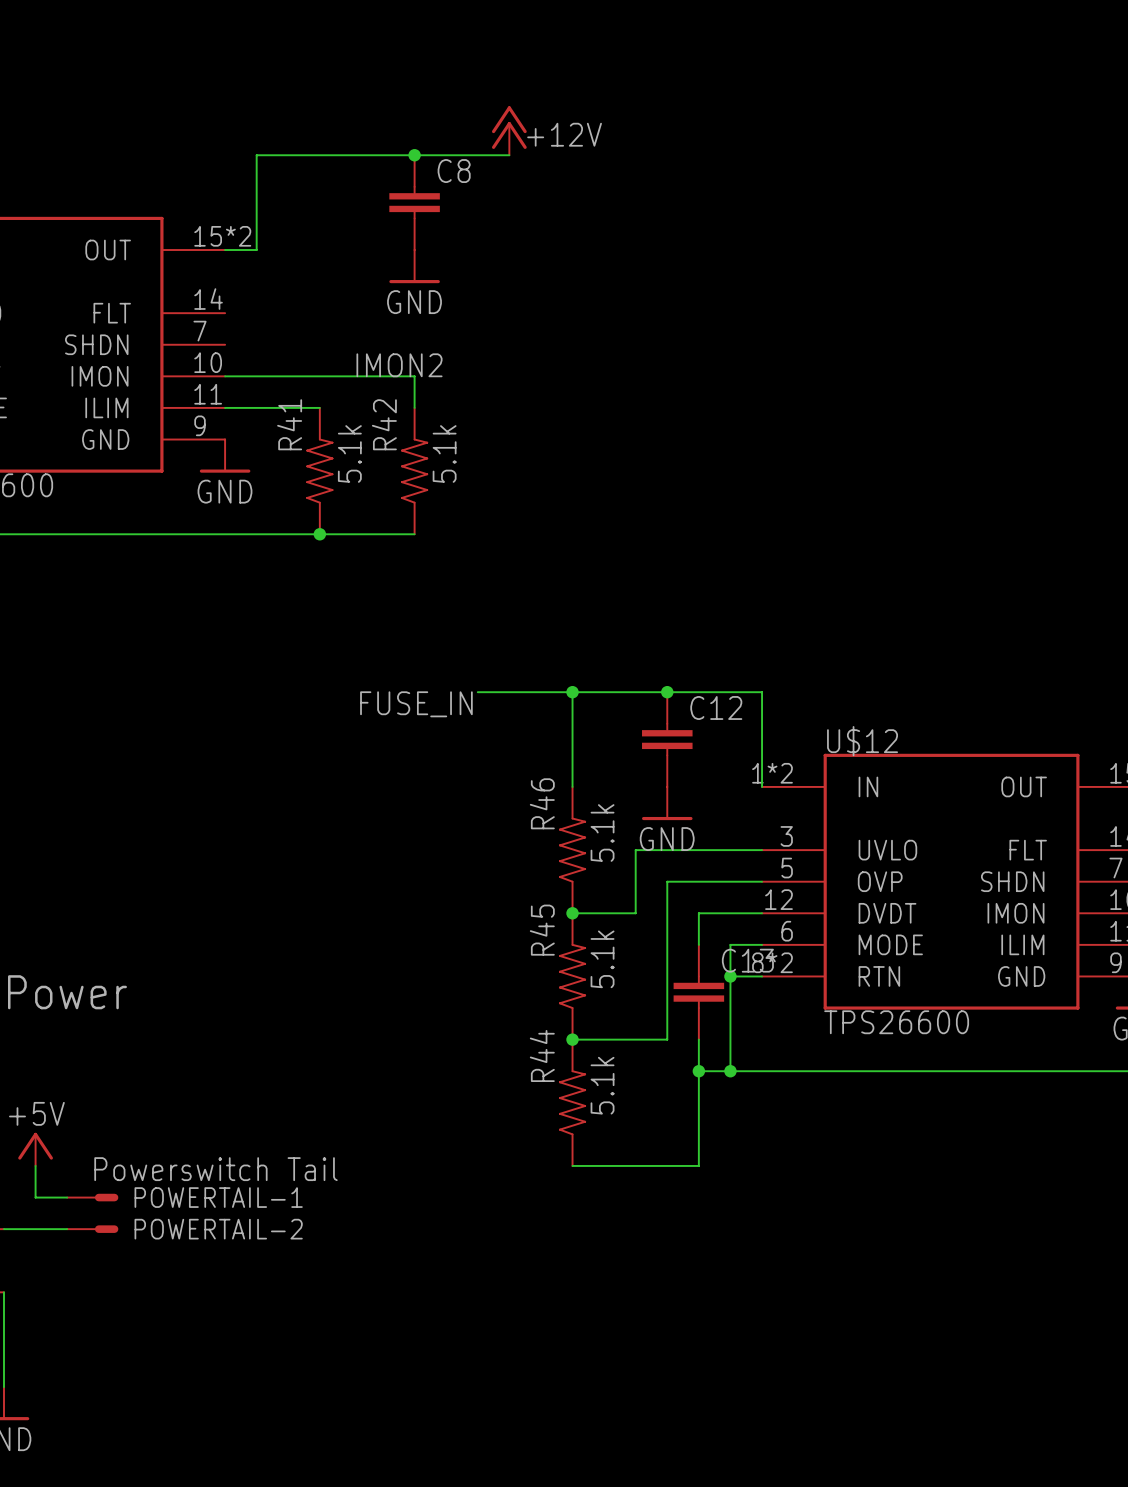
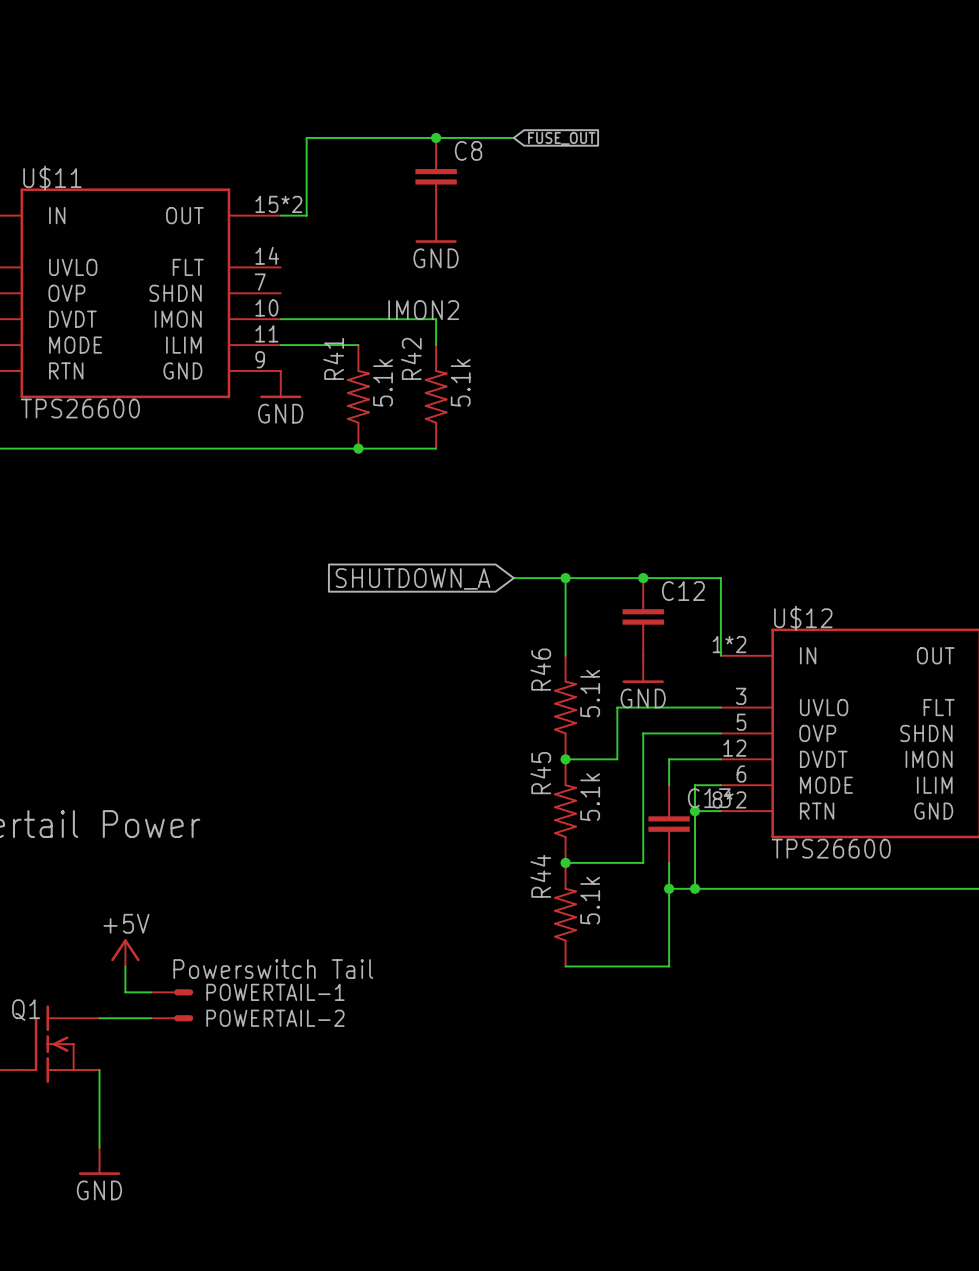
power symbol: +12V (509, 130) -> none
global label: none -> FUSE_OUT (561, 138)
wire: (477, 692) (509, 692) -> none
global label: none -> SHUTDOWN_A (413, 578)
label: FUSE_IN (416, 704) -> none

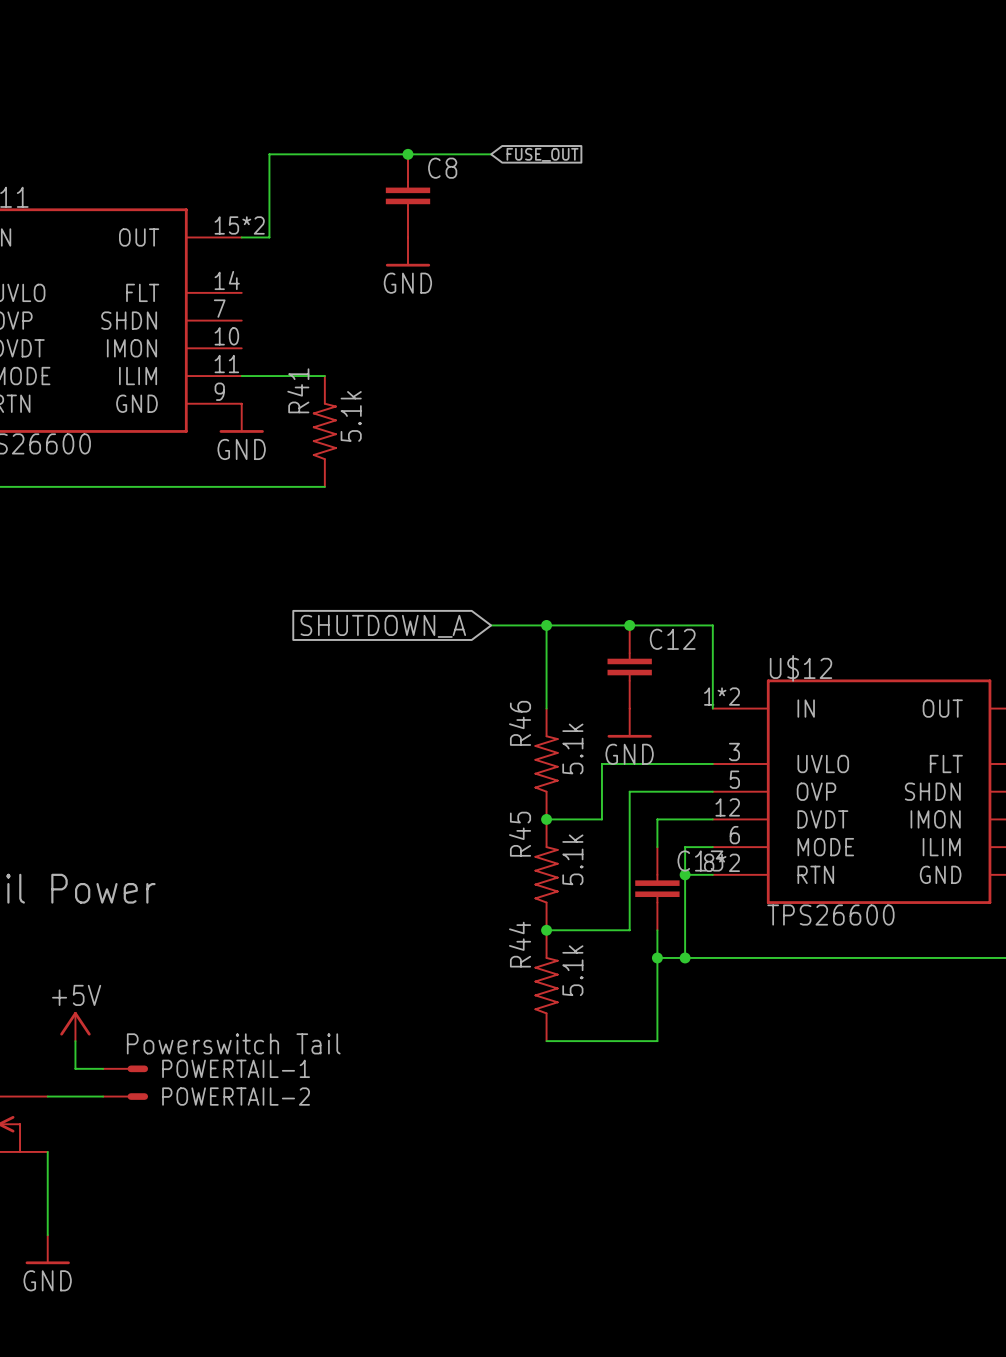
label: IMON2 (423, 310) -> none
wire: (280, 319) (436, 319) (436, 345) -> none
R42: 5.1k (436, 396) -> none
wire: (358, 448) (436, 448) -> none
junction: (358, 448) -> none

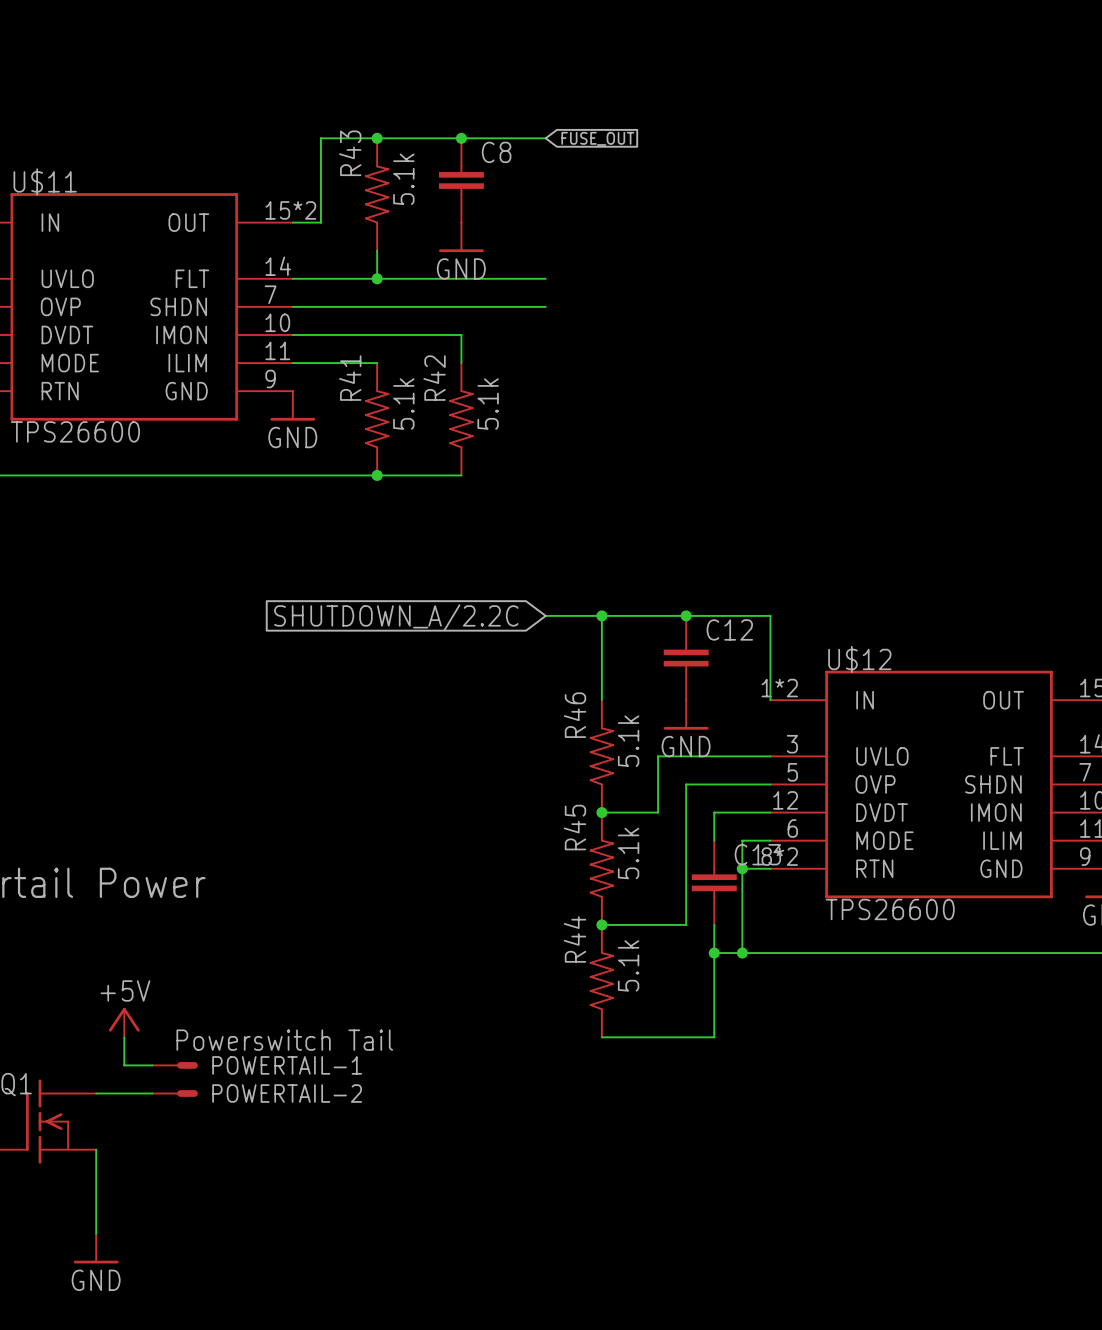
junction: none -> (377, 138)
R43: none -> 5.1k (377, 194)
wire: none -> (377, 250) (377, 278)
wire: none -> (292, 278) (545, 278)
junction: none -> (377, 278)
wire: none -> (292, 306) (545, 306)
wire: none -> (292, 334) (461, 334) (461, 363)
R42: none -> 5.1k (461, 419)
wire: none -> (377, 475) (461, 475)
junction: none -> (377, 475)
global label: SHUTDOWN_A (383, 626) -> SHUTDOWN_A/2.2C (396, 617)

